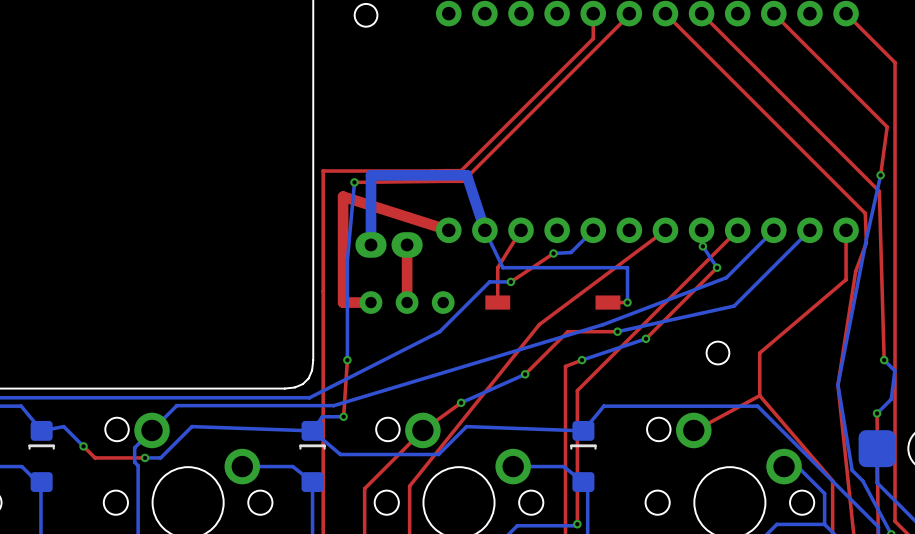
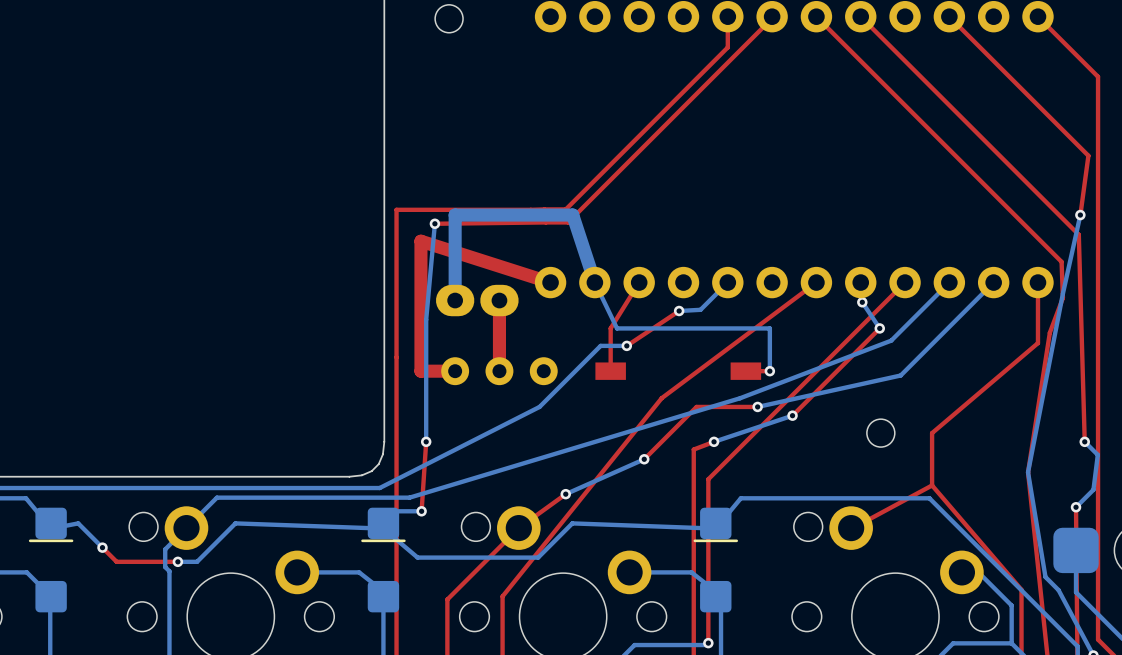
part footprint: [28, 420, 56, 493] -> [28, 507, 74, 613]
part footprint: [299, 420, 327, 493] -> [361, 507, 406, 613]
part footprint: [569, 420, 597, 493] -> [693, 507, 739, 613]

